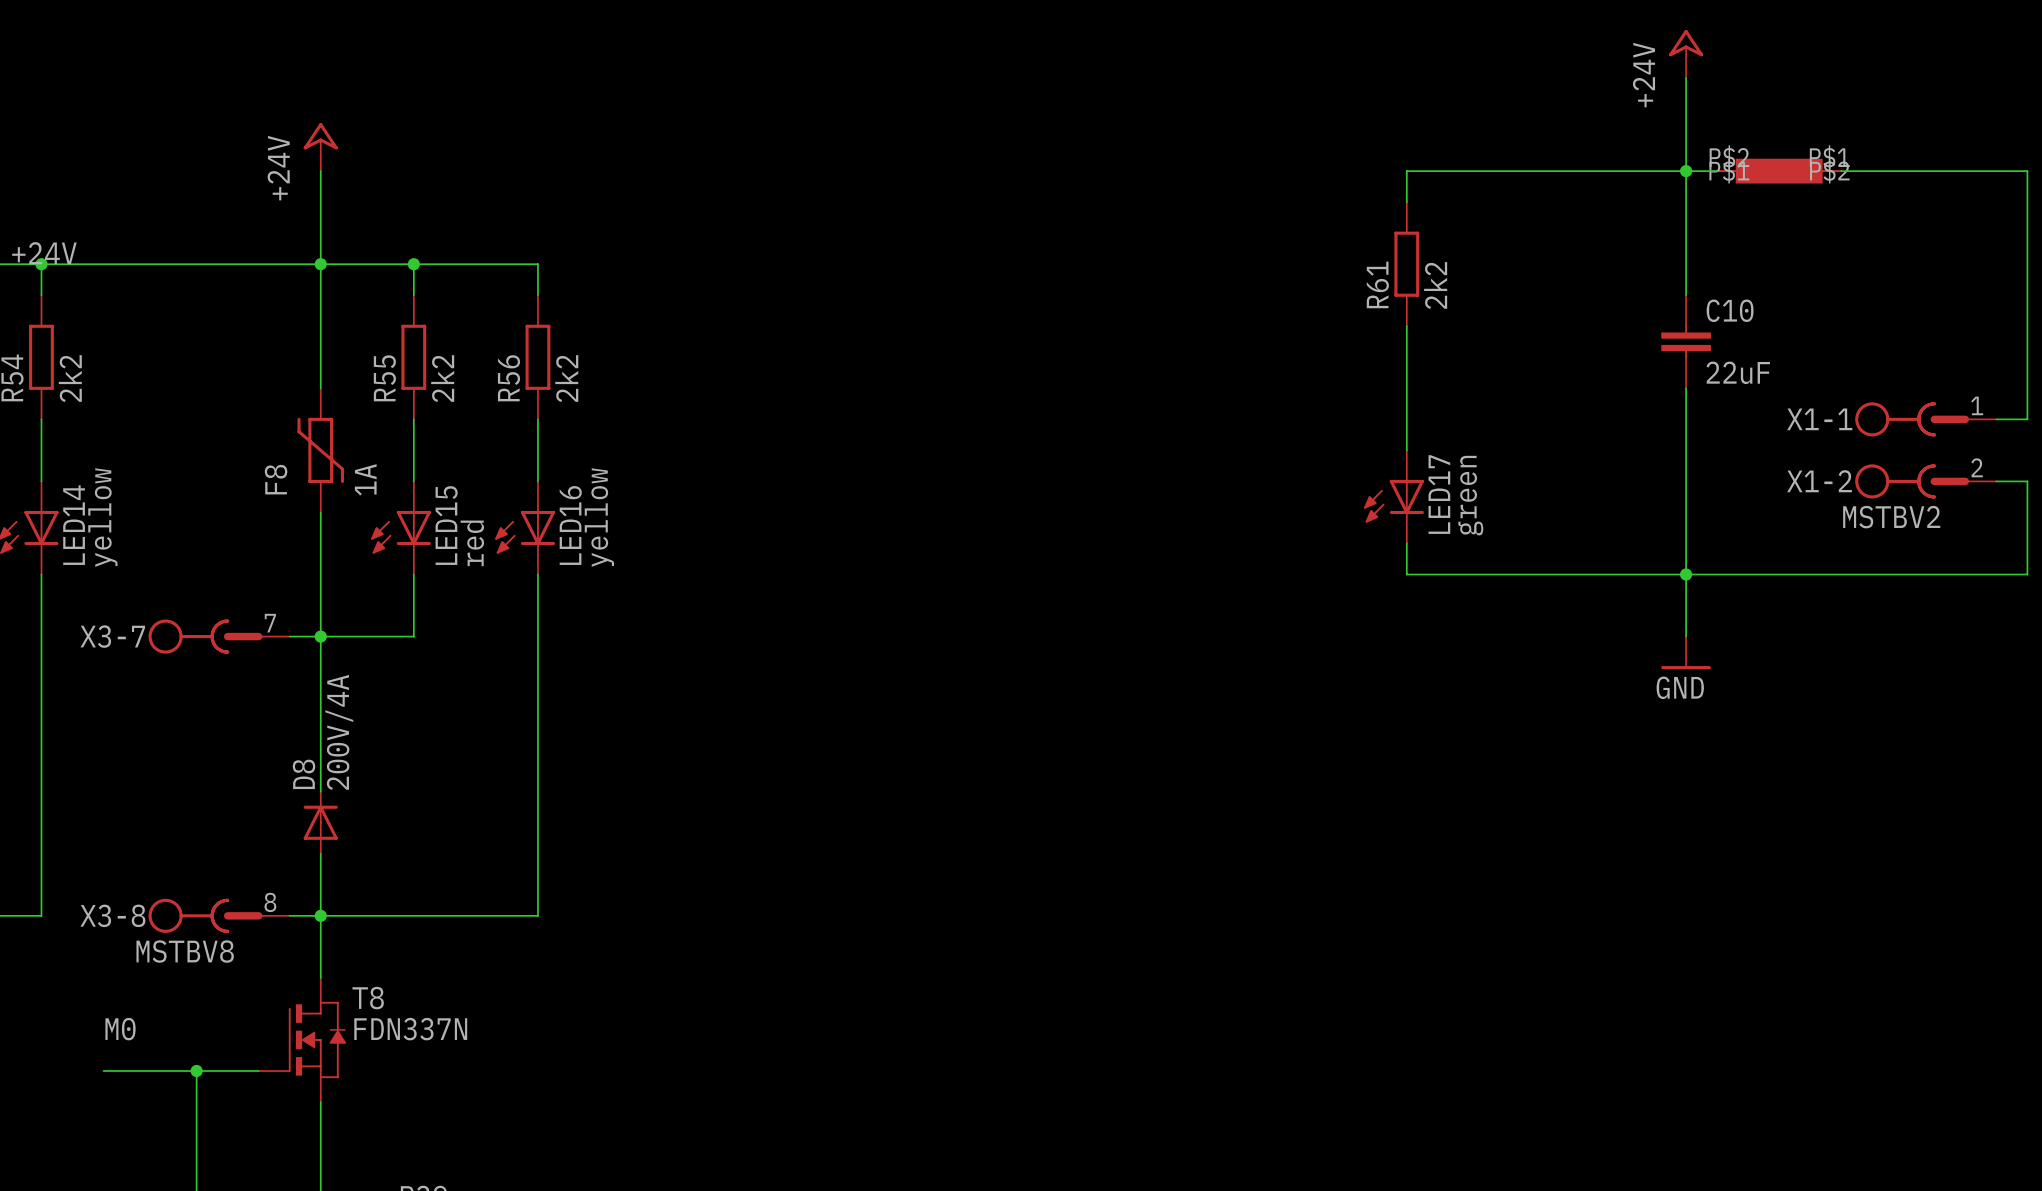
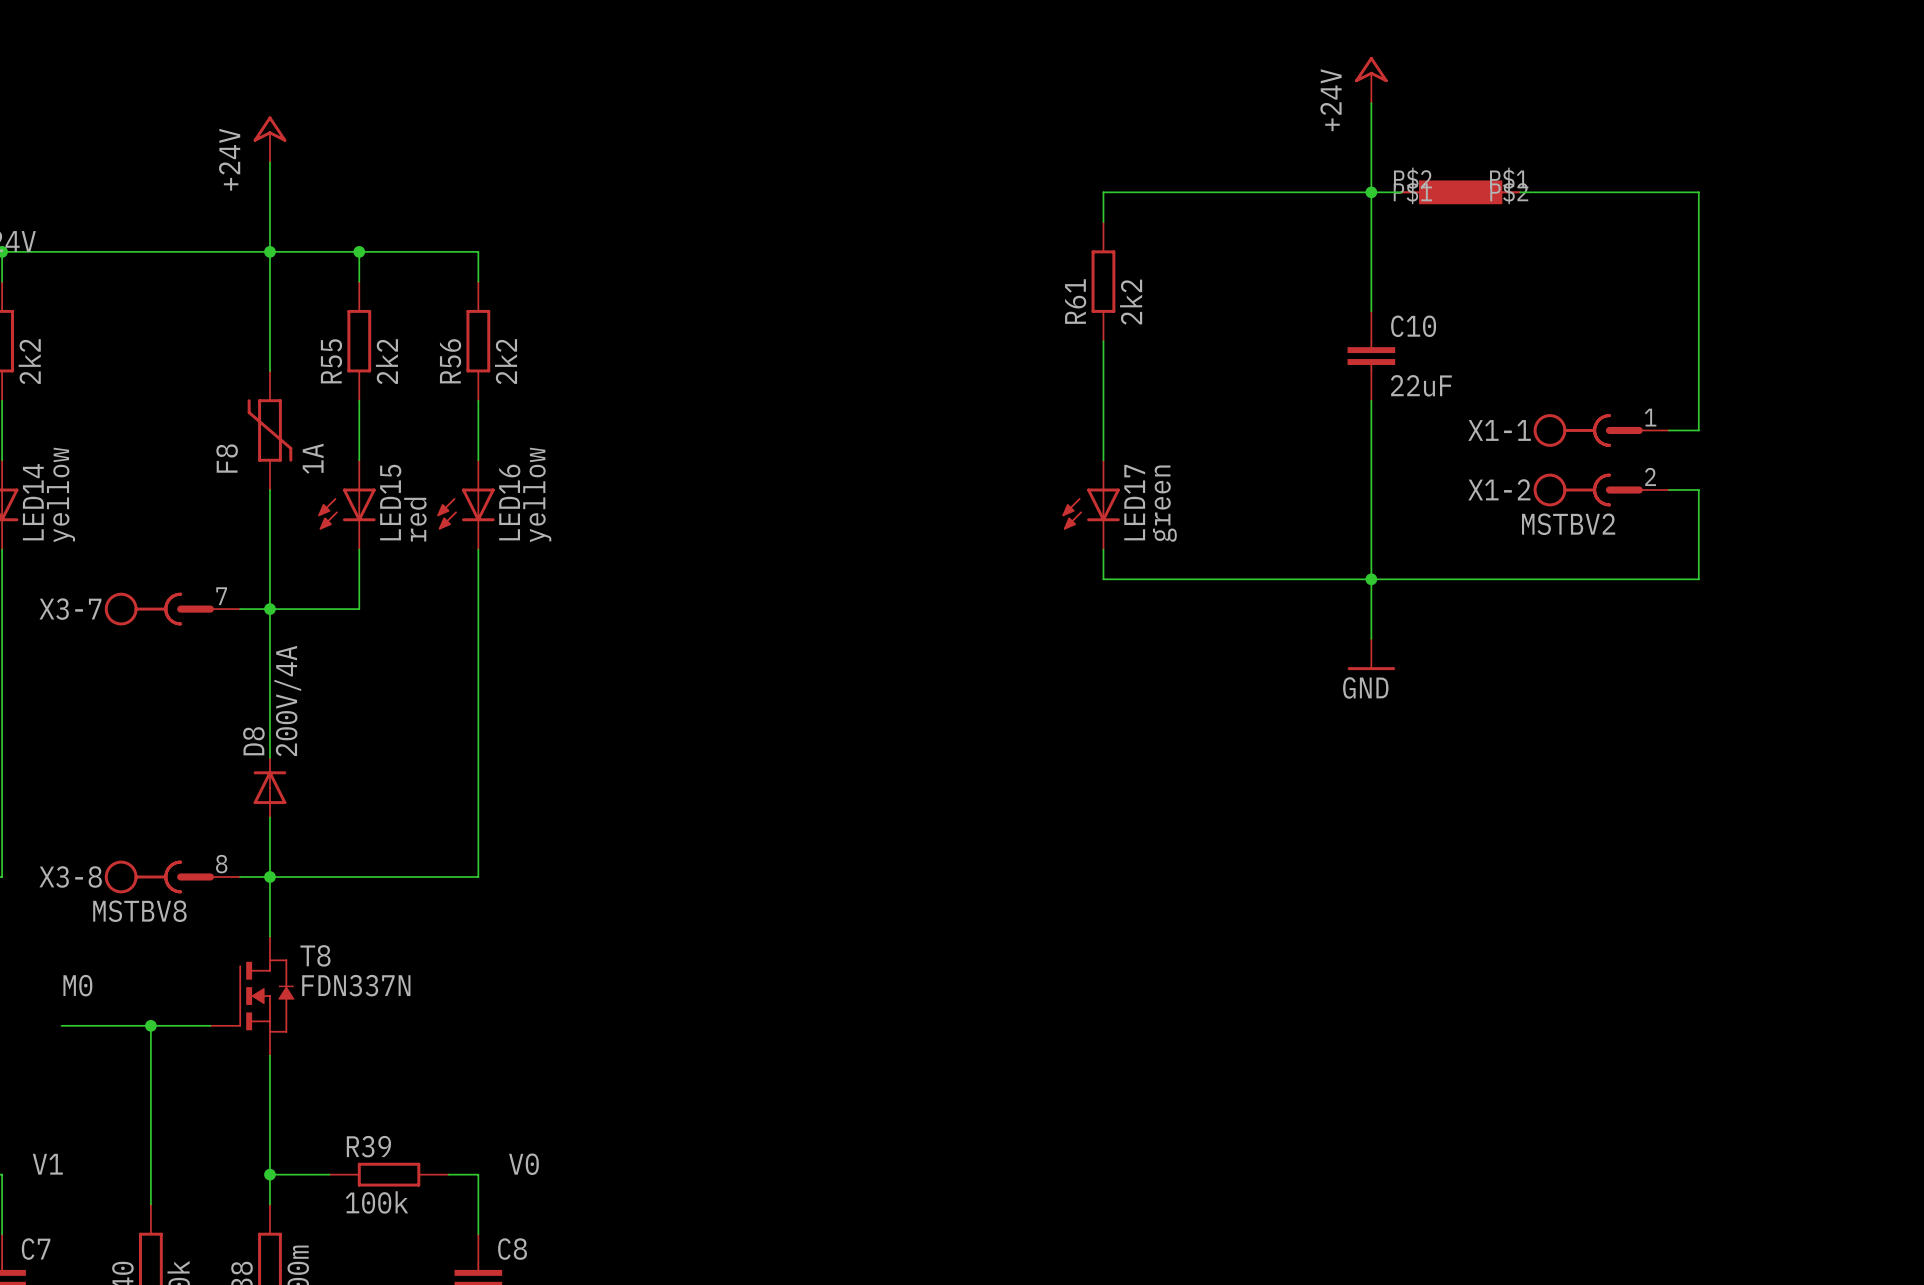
power symbol position: +24V (1686, 53) -> +24V (1371, 79)
wire: (1686, 78) (1686, 295) -> (1371, 103) (1371, 311)
junction: (1686, 171) -> none
wire: (1717, 171) (1406, 171) (1406, 202) -> (1401, 192) (1103, 192) (1103, 222)
part position: (1779, 171) -> (1460, 192)
wire: (1841, 171) (2027, 171) (2027, 419) (1996, 419) -> (1520, 192) (1698, 192) (1698, 430) (1669, 430)
junction: none -> (1371, 192)
R61 position: (1406, 264) -> (1103, 281)
wire: (1406, 326) (1406, 450) -> (1103, 341) (1103, 460)
C10 position: (1686, 341) -> (1371, 356)
wire: (1686, 388) (1686, 636) -> (1371, 400) (1371, 638)
X1-1 position: (1925, 419) -> (1601, 430)
X1-2 position: (1925, 481) -> (1601, 490)
wire: (1996, 481) (2027, 481) (2027, 574) (1406, 574) (1406, 543) -> (1669, 490) (1698, 490) (1698, 579) (1103, 579) (1103, 549)
LED17 position: (1393, 496) -> (1091, 504)
junction: (1686, 574) -> none
junction: none -> (1371, 579)
power symbol position: GND (1686, 652) -> GND (1371, 654)

